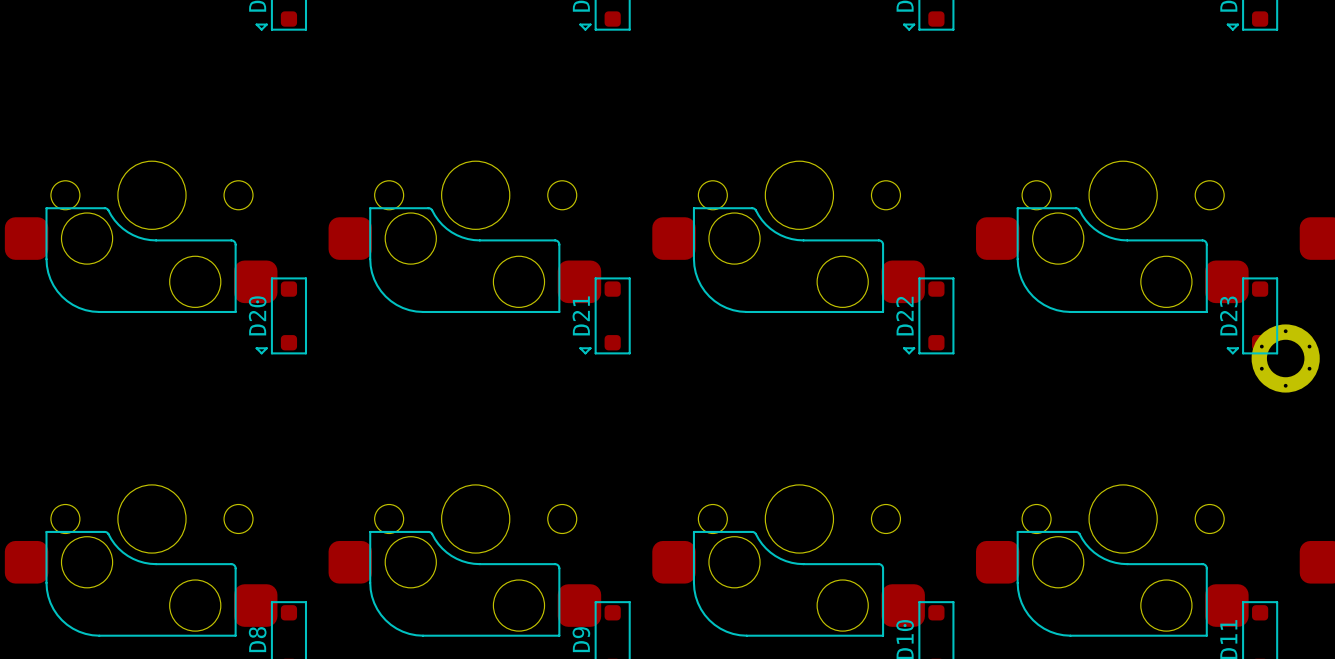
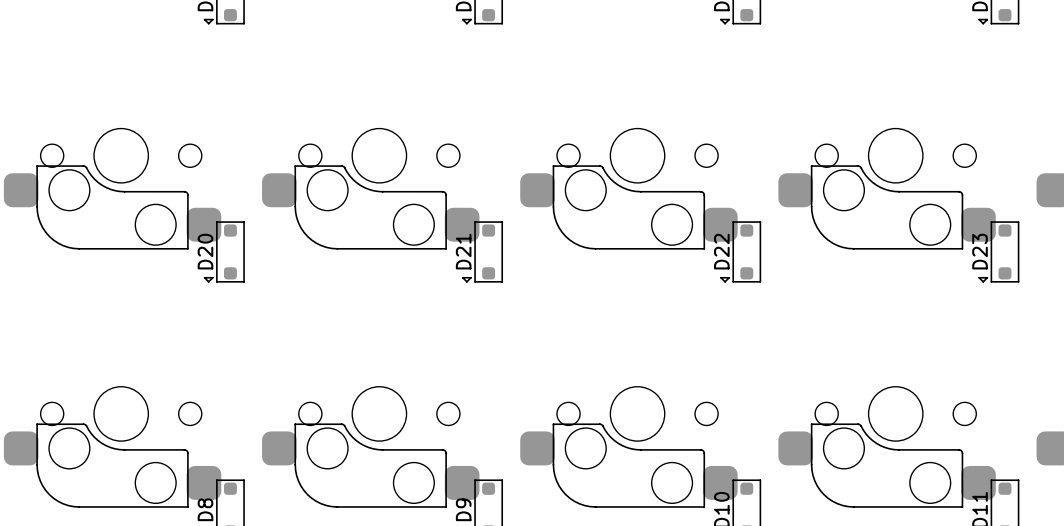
part: (1285, 358) -> none

